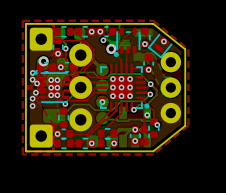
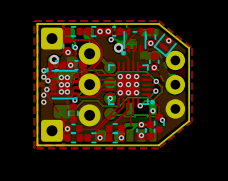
top track: none -> (133, 102) (130, 125)

